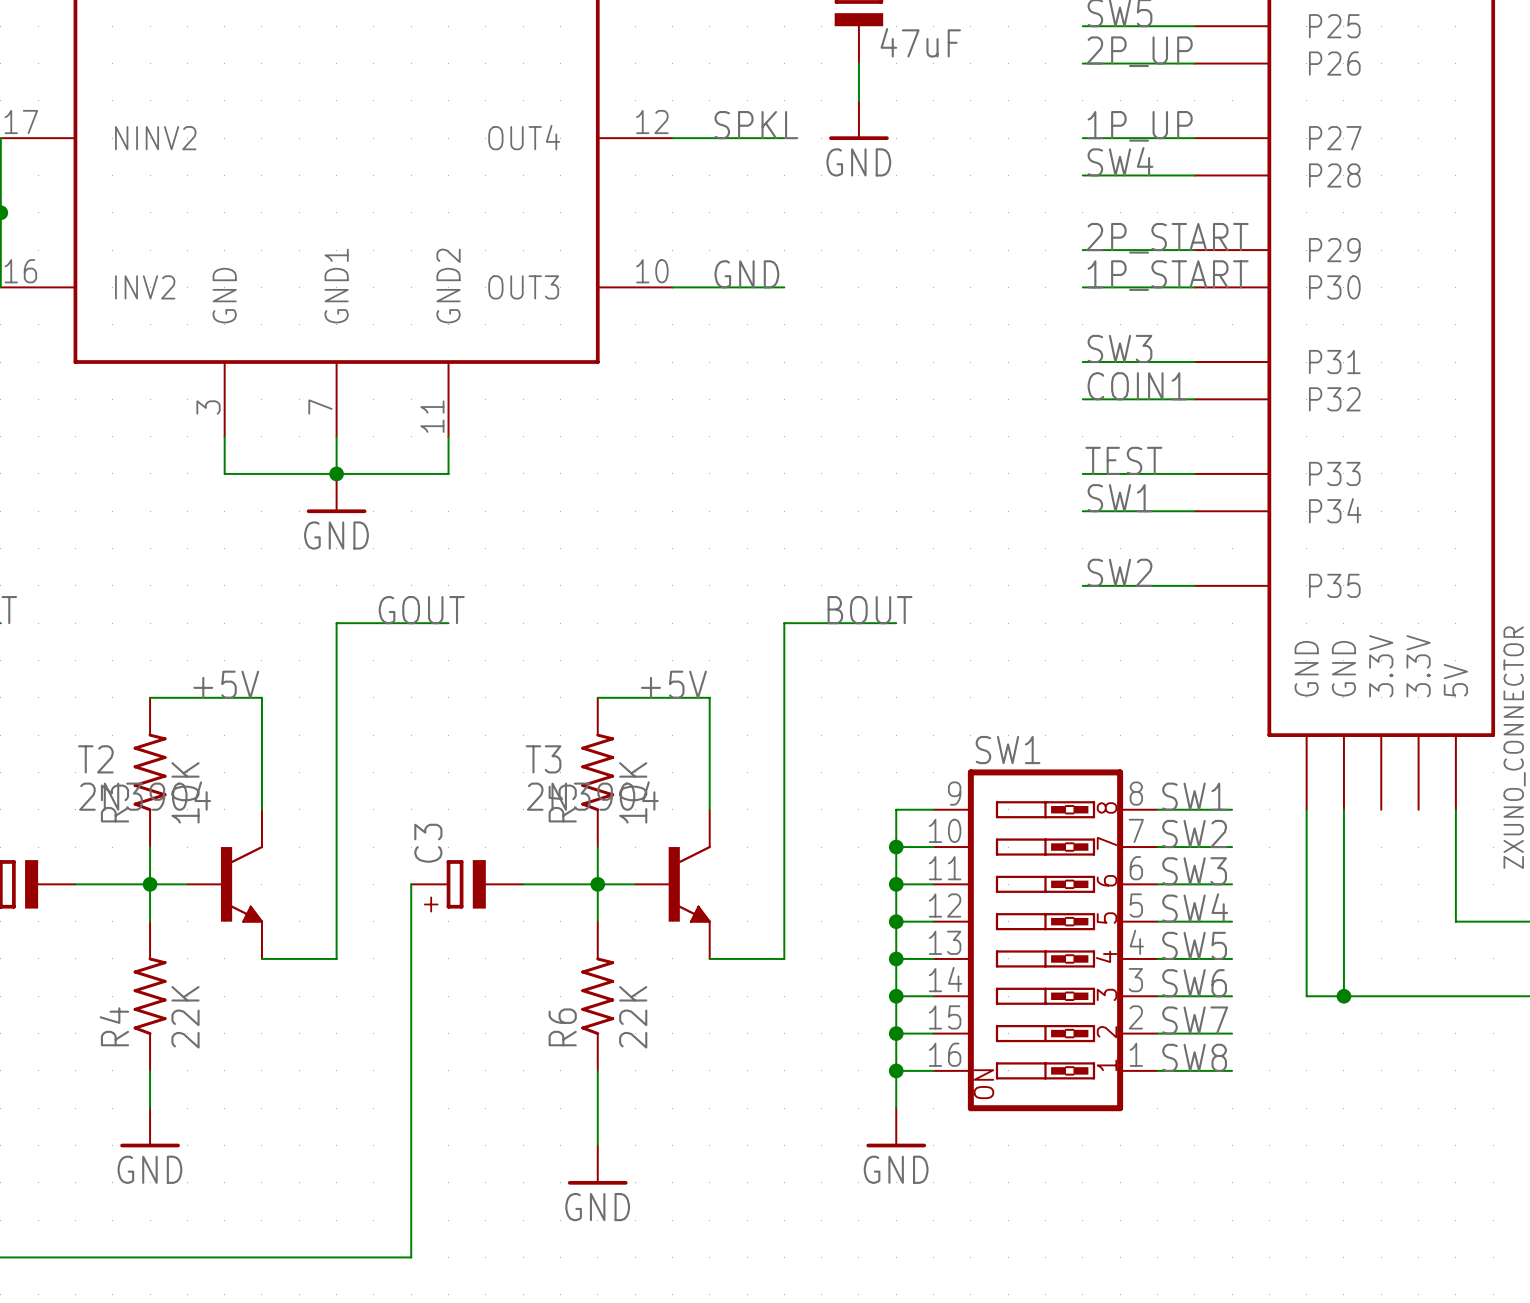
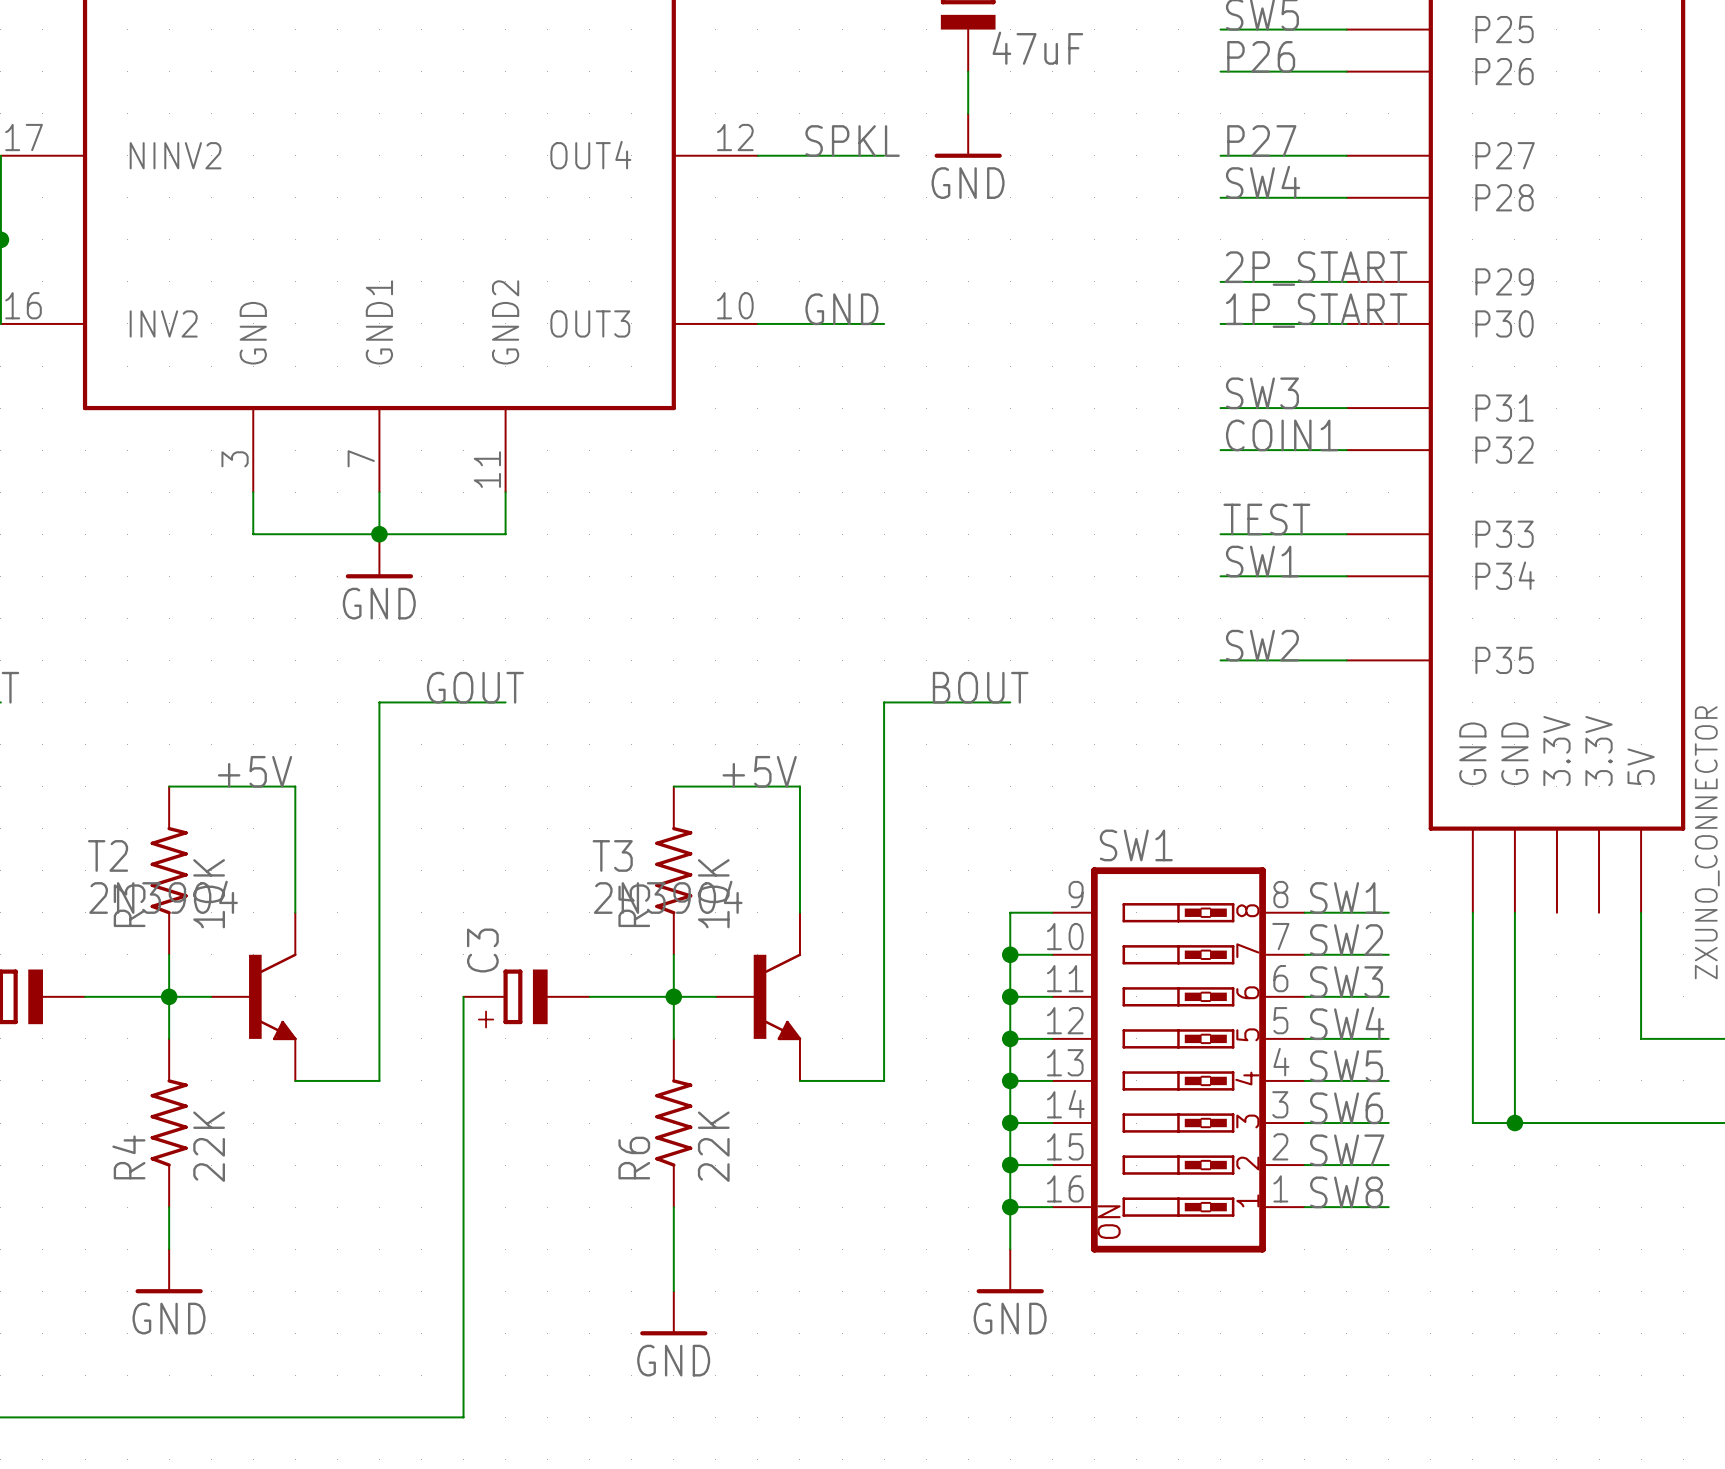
label: 2P_UP (1139, 51) -> P26 (1261, 56)
label: 1P_UP (1140, 126) -> P27 (1261, 141)

